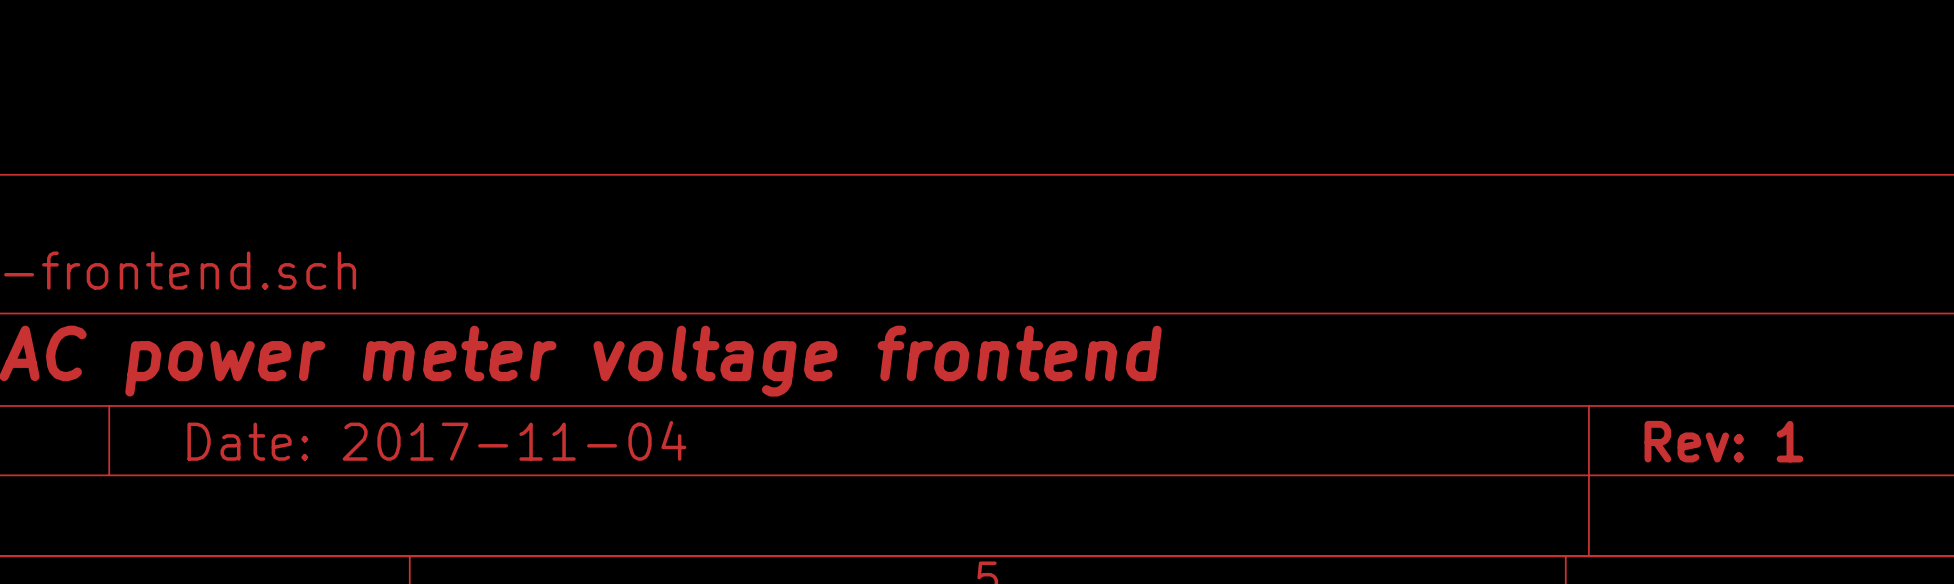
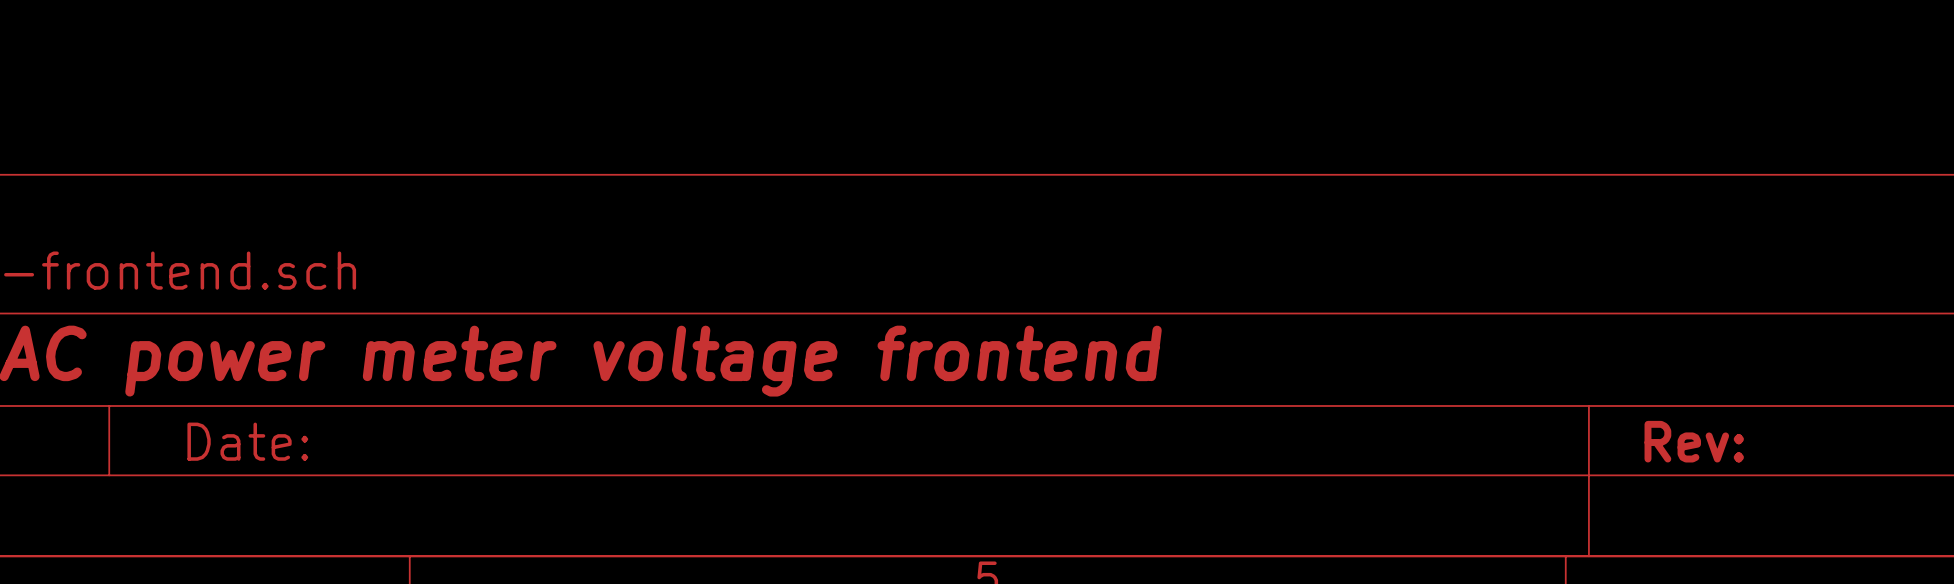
title block: Date: 2017-11-04 (436, 440) -> Date: (247, 441)
title block: Rev: 1 (1723, 441) -> Rev: (1694, 441)

